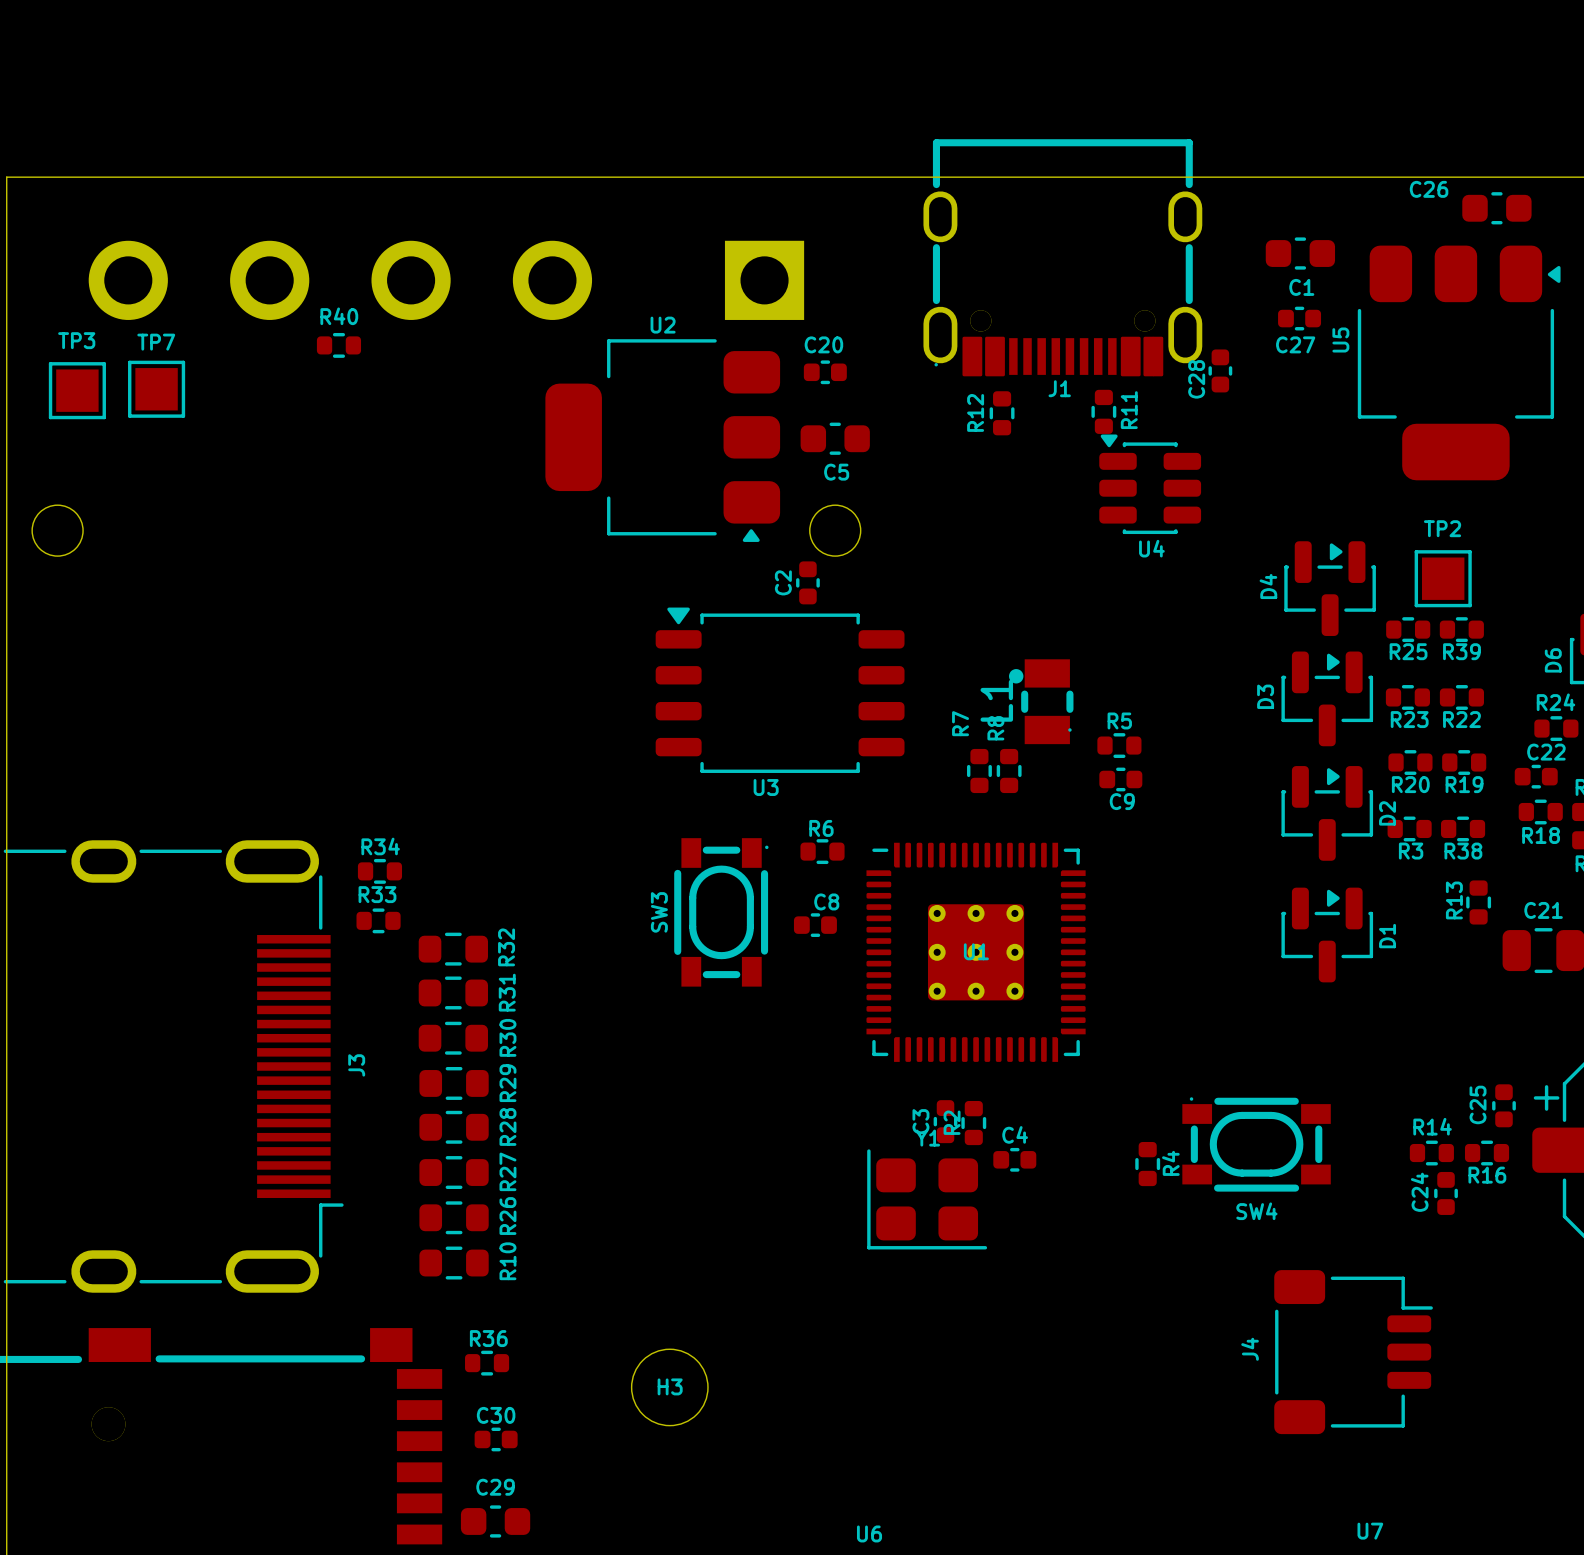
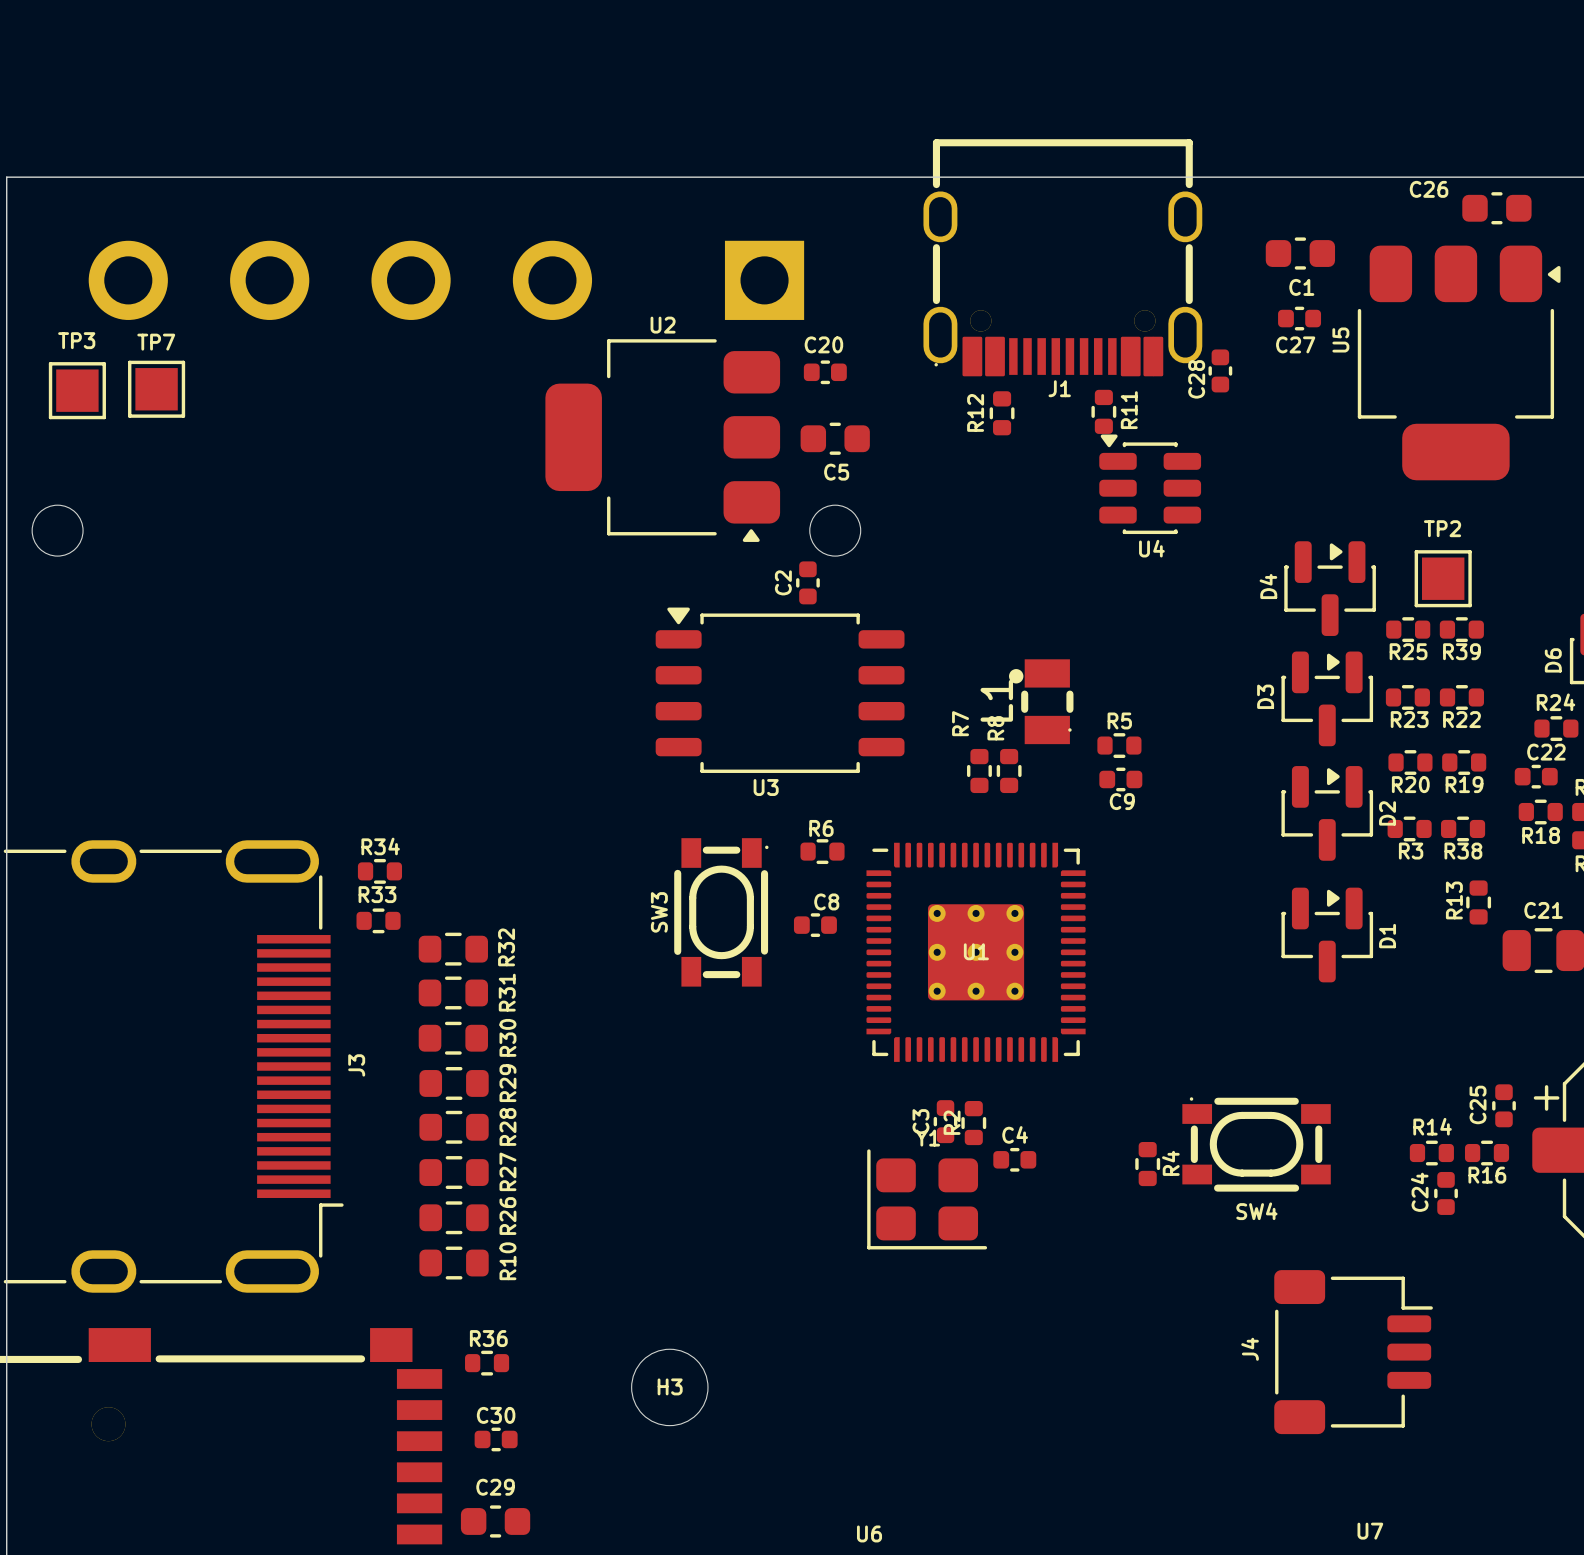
R40: (338, 345) -> none

